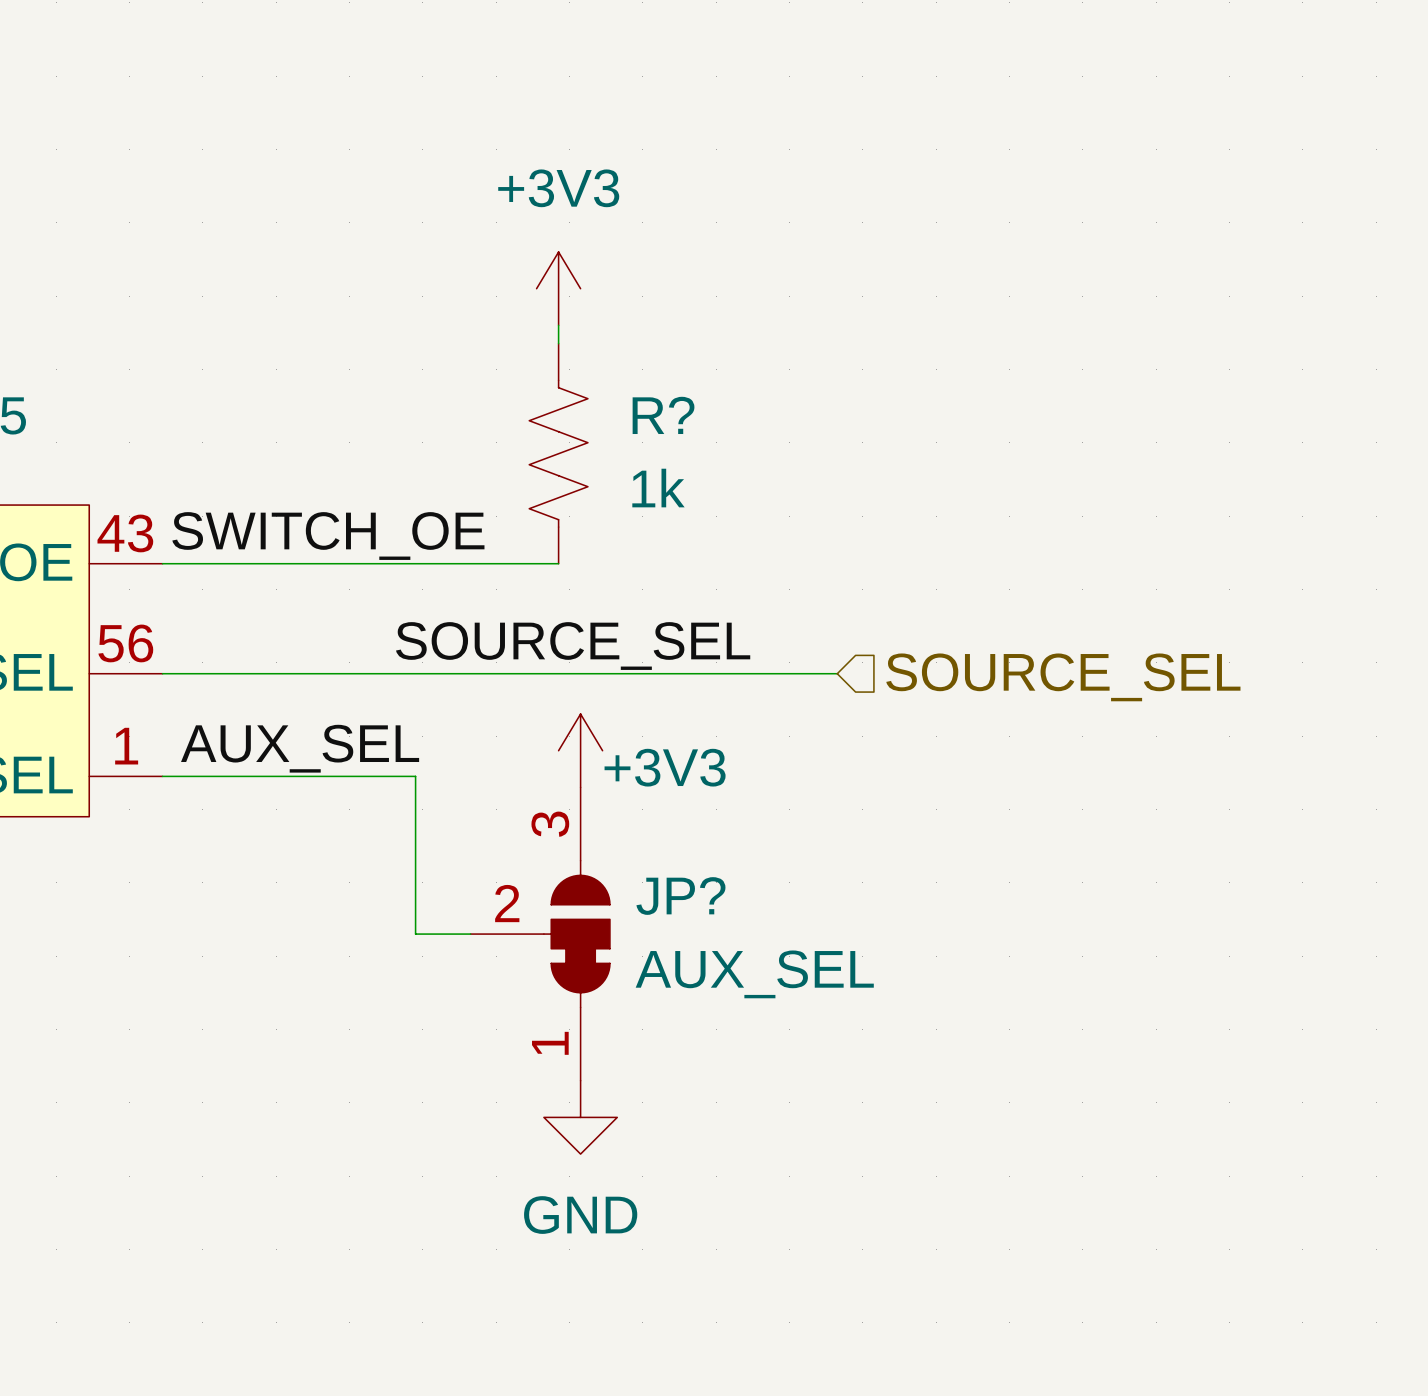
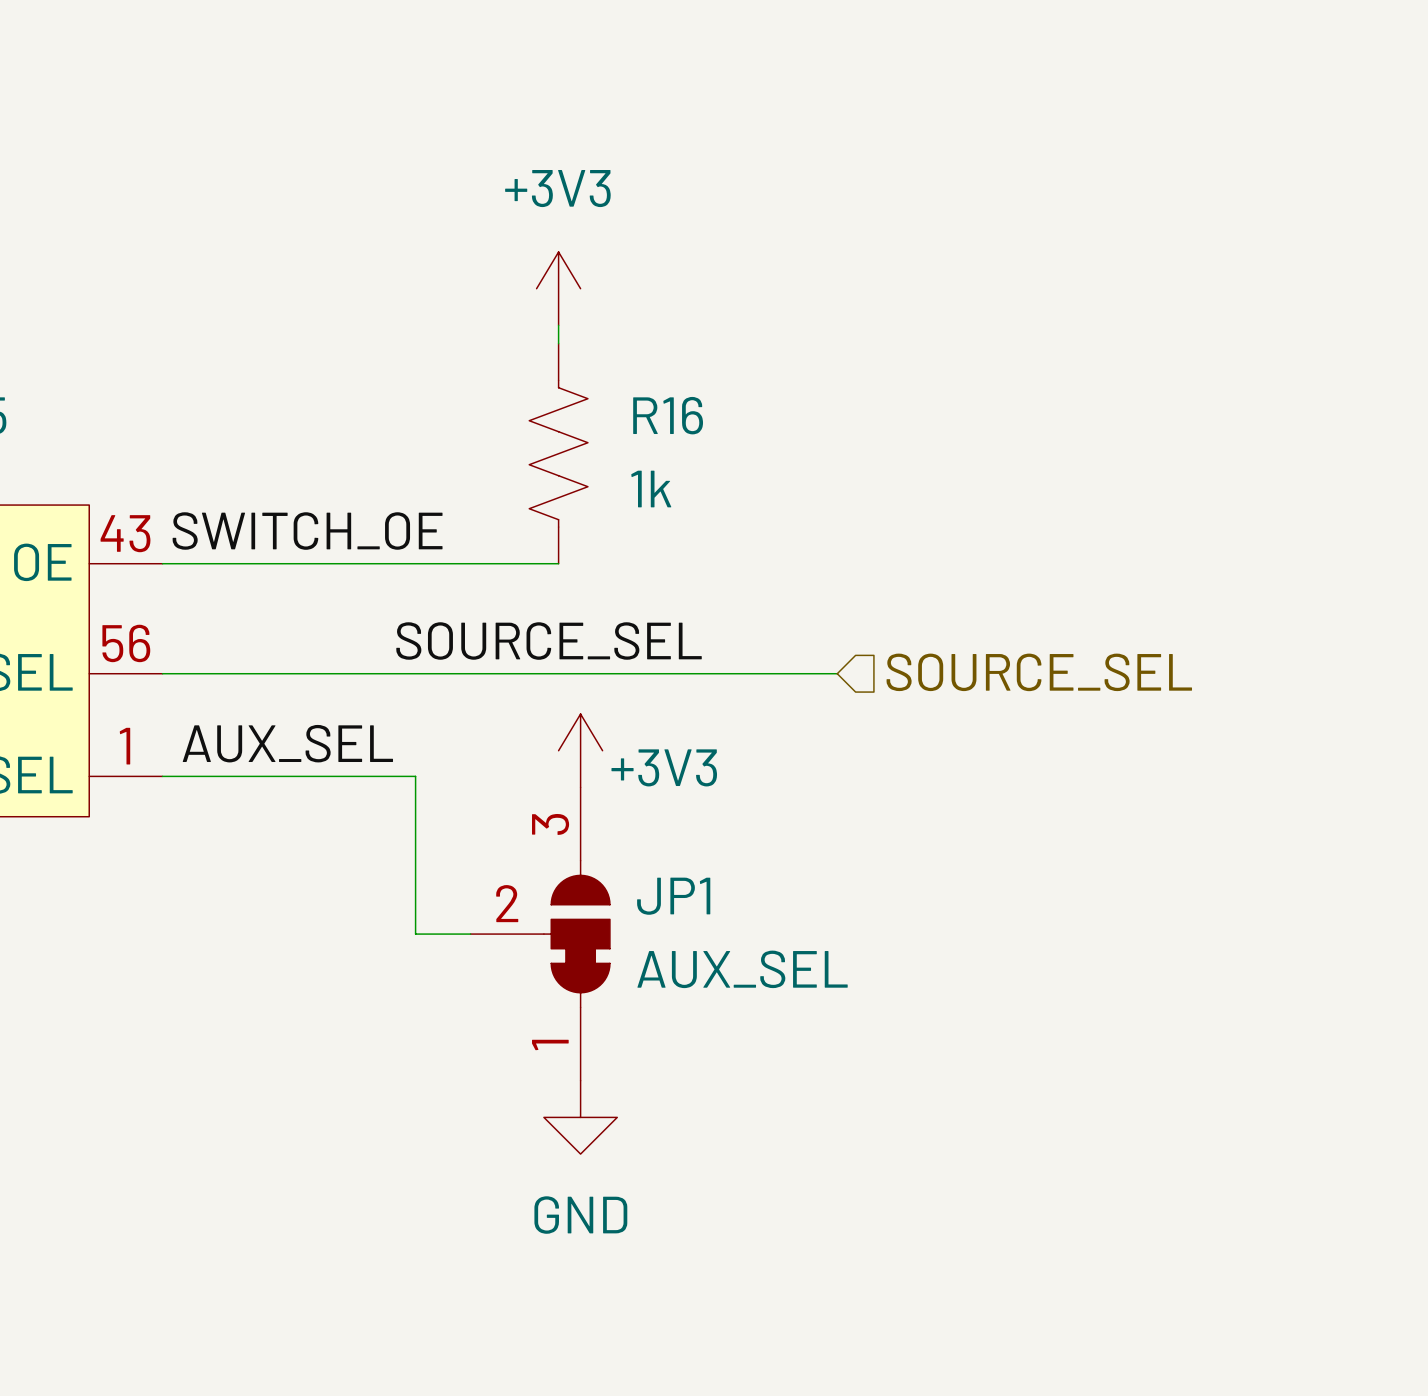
R? name: R? (663, 415) -> R16 (668, 415)
JP? name: JP? (680, 896) -> JP1 (673, 896)

